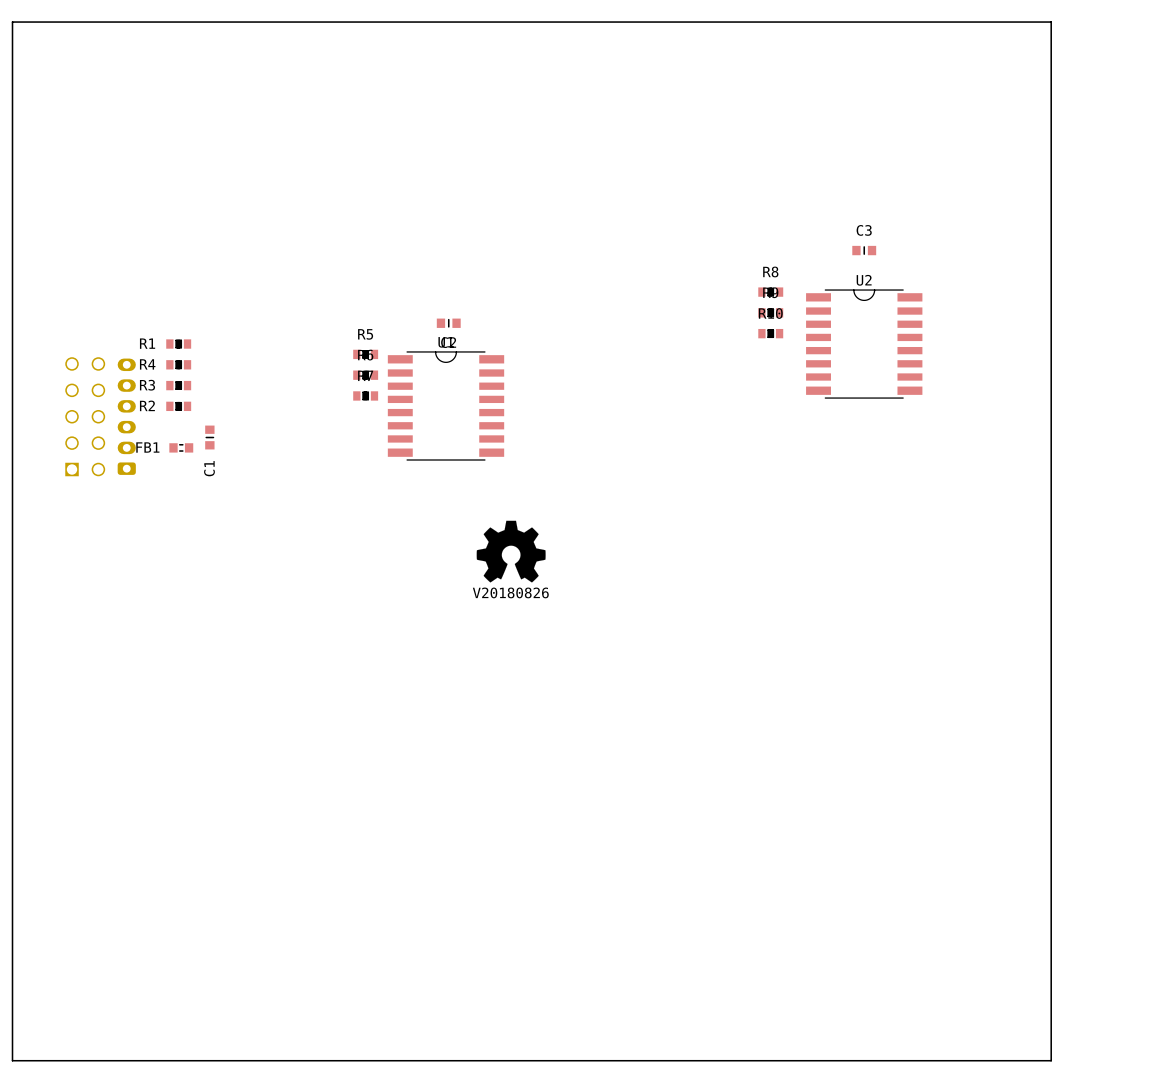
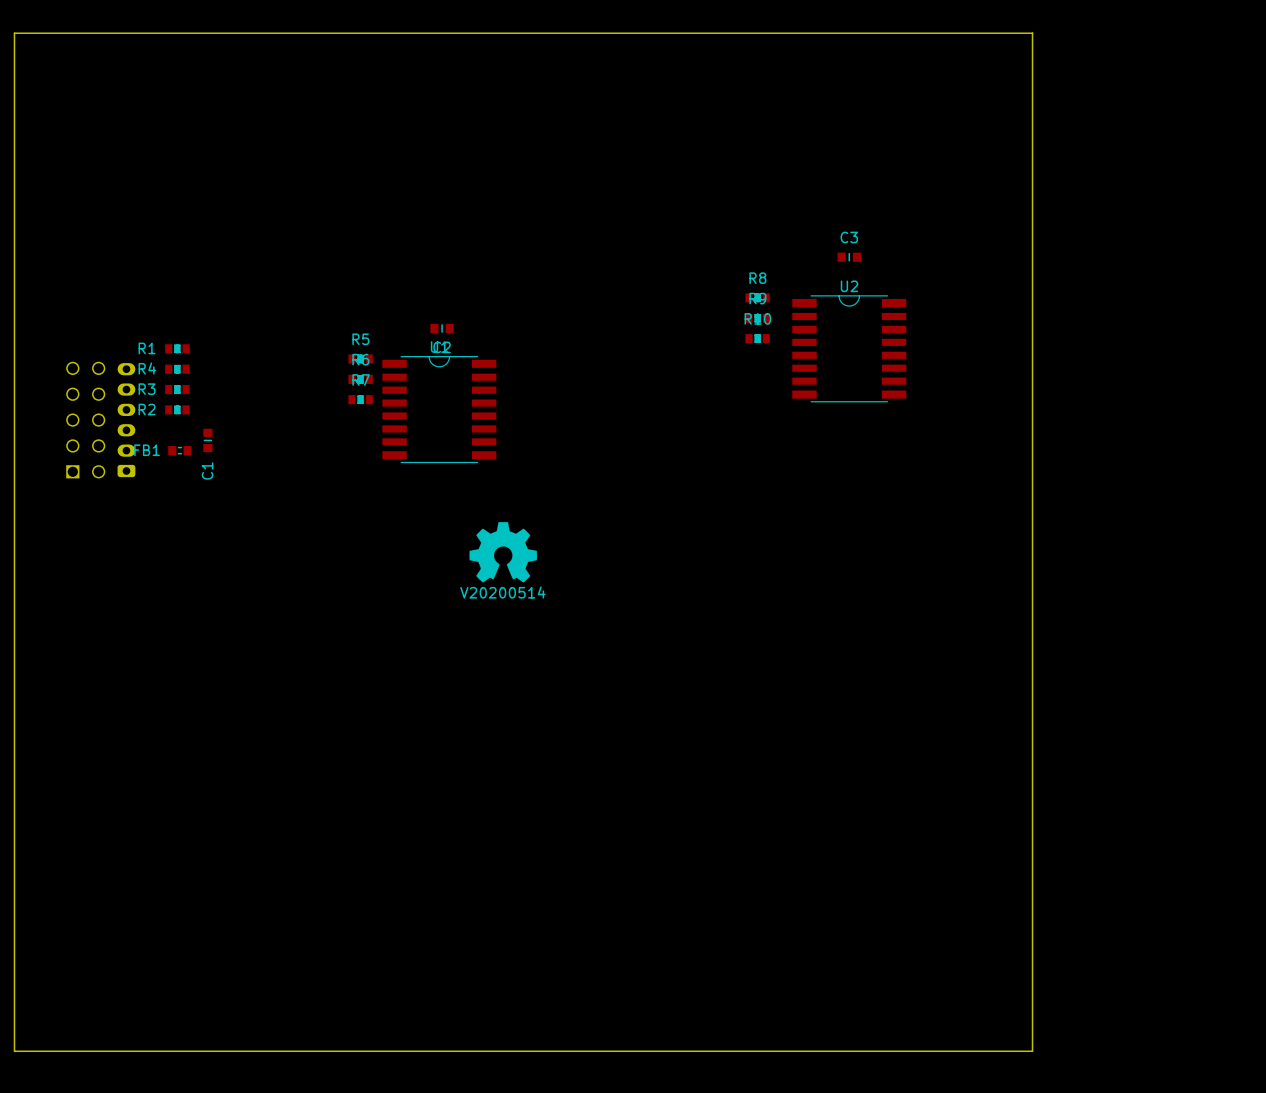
drawing shape: [472, 587, 549, 599] -> [460, 586, 546, 599]

